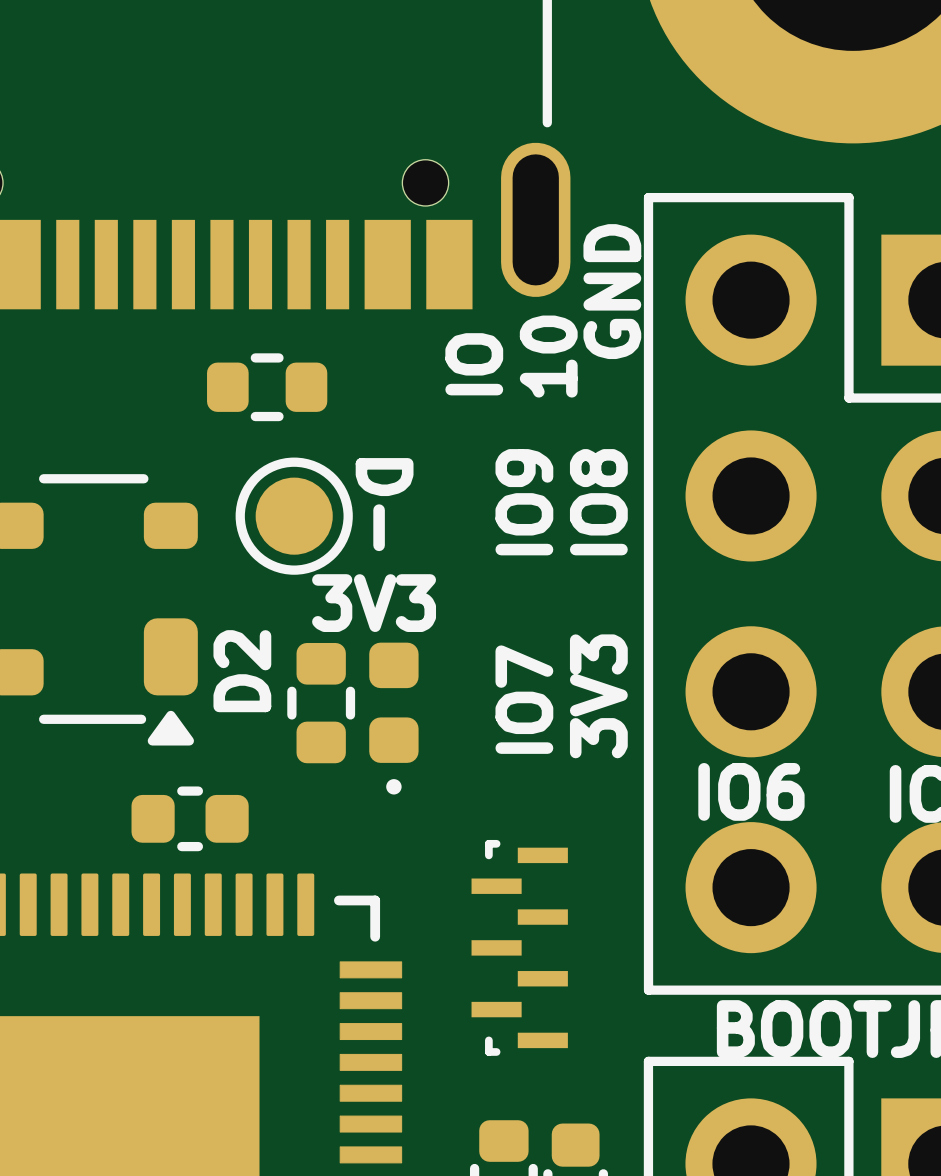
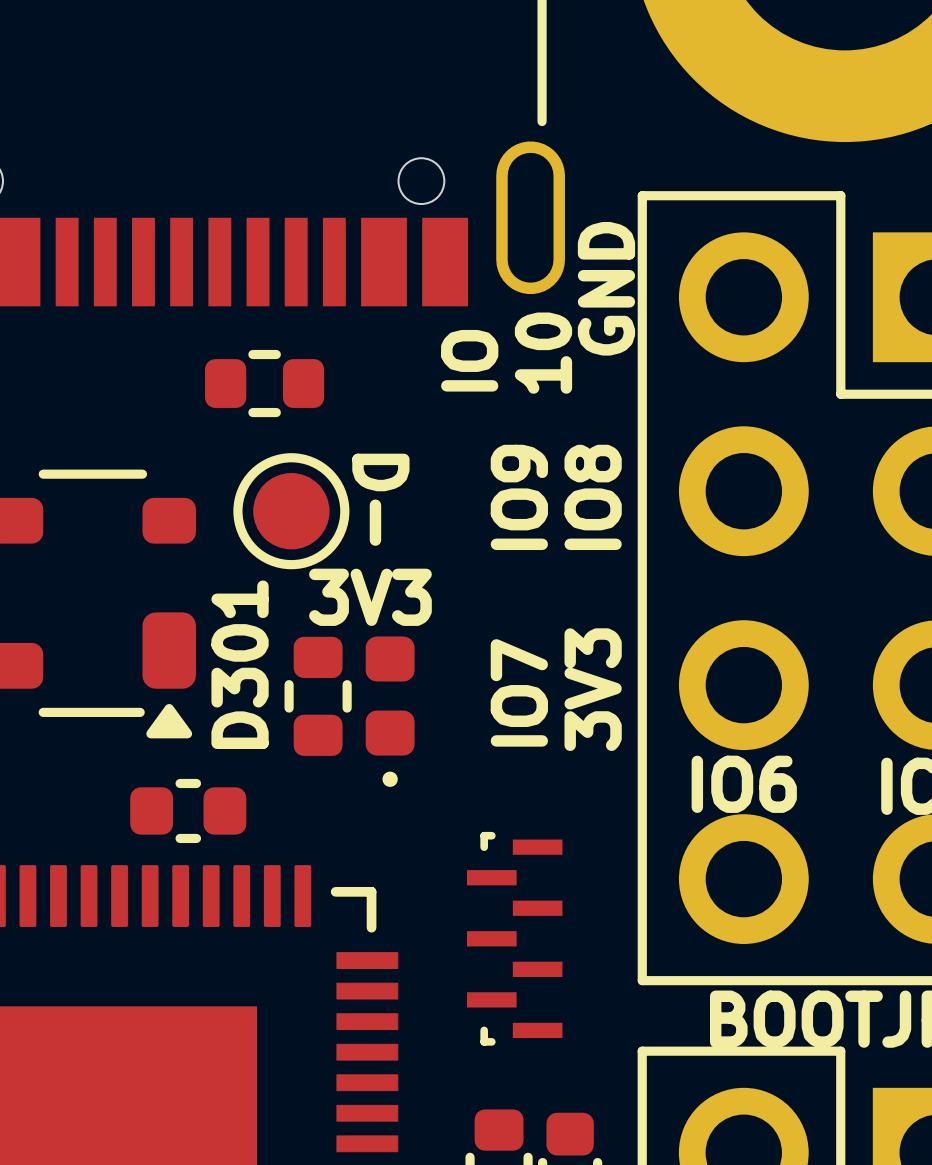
D2 name: D2 (242, 671) -> D301 (240, 664)

